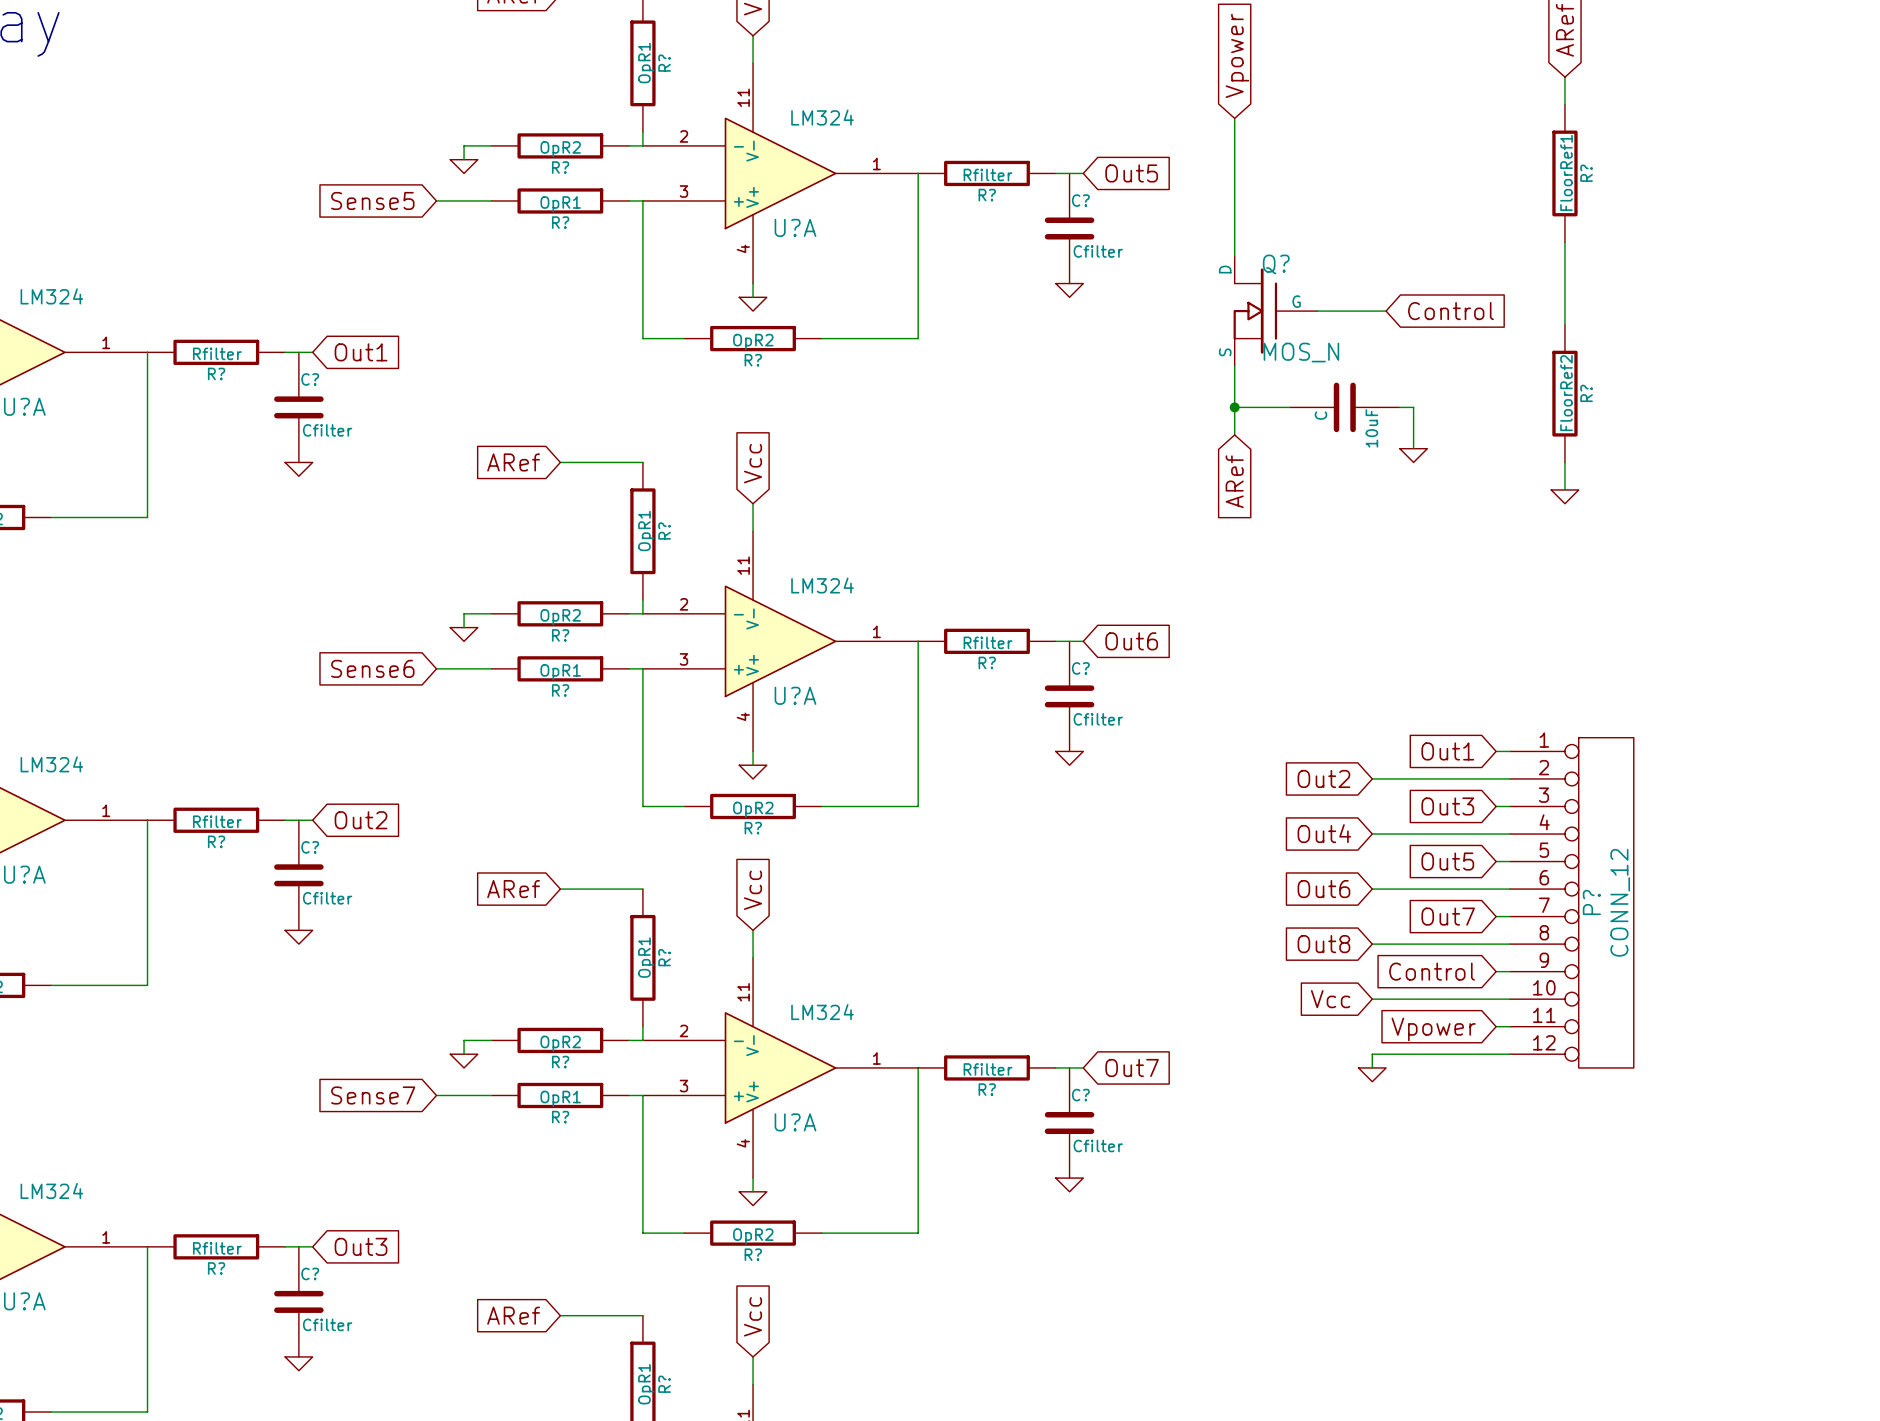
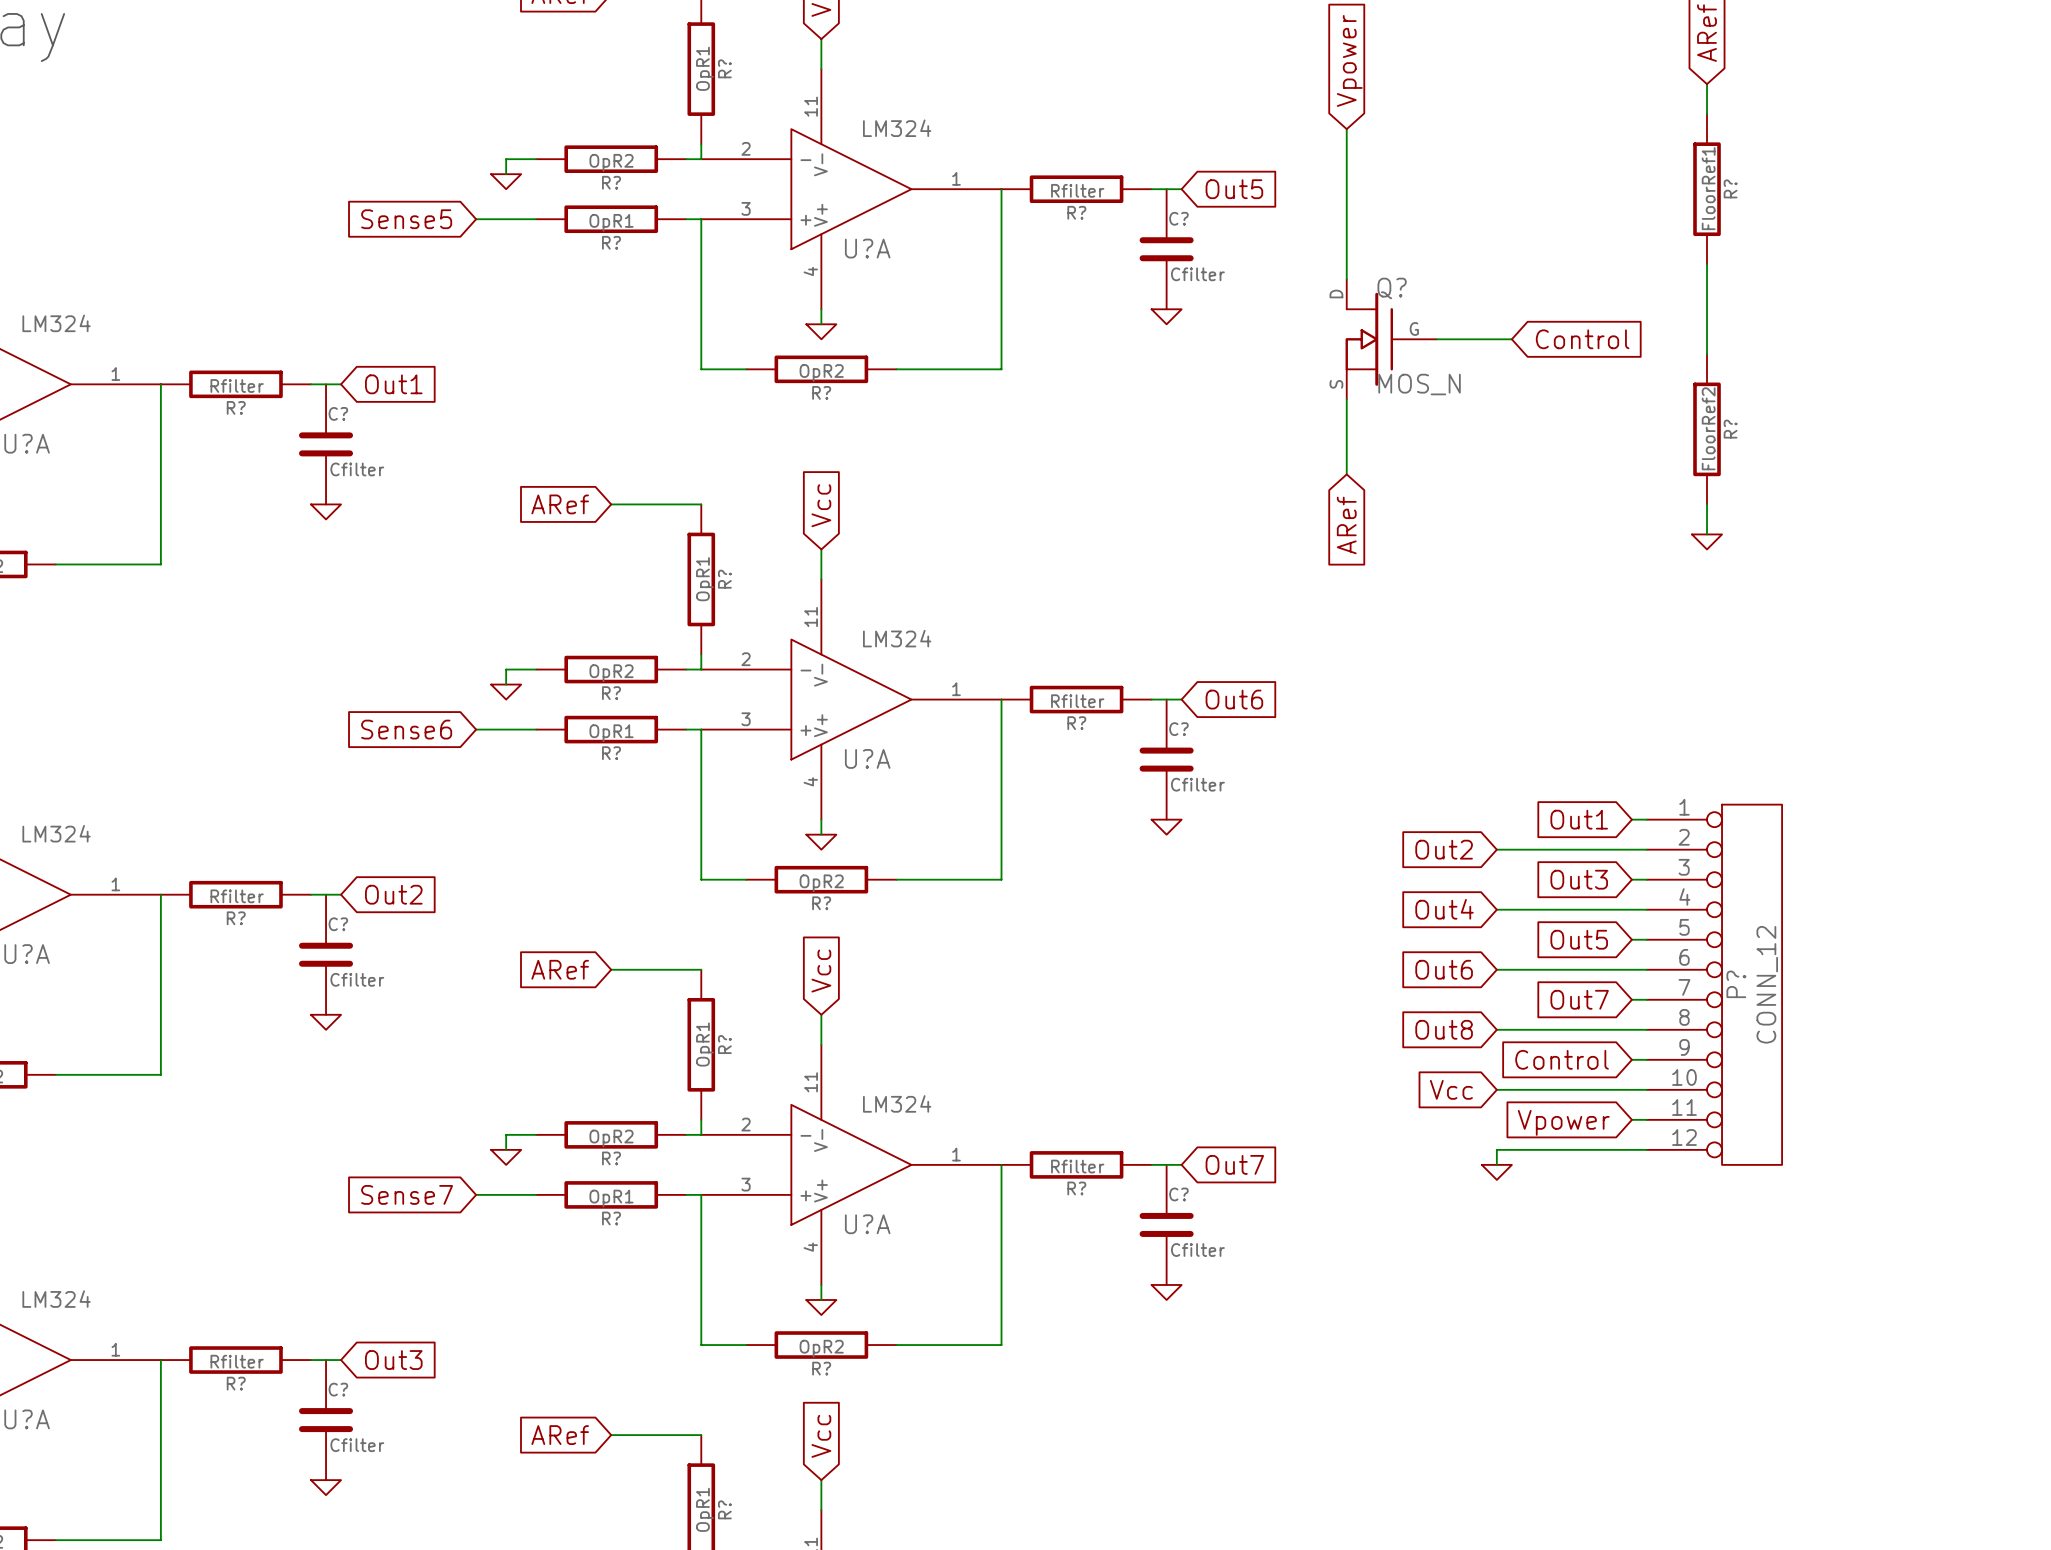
wire: (1234, 407) (1289, 407) -> none
junction: (1234, 407) -> none
10uF: C (1344, 407) -> none
wire: (1399, 407) (1413, 407) (1413, 448) -> none
power symbol: (1413, 455) -> none

